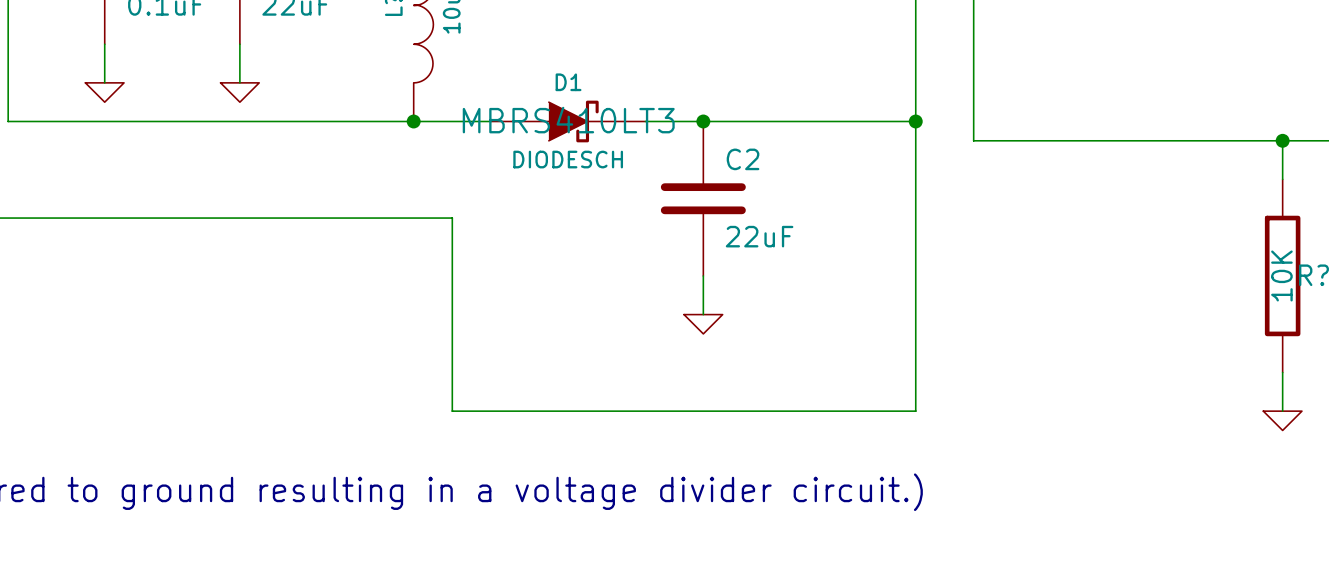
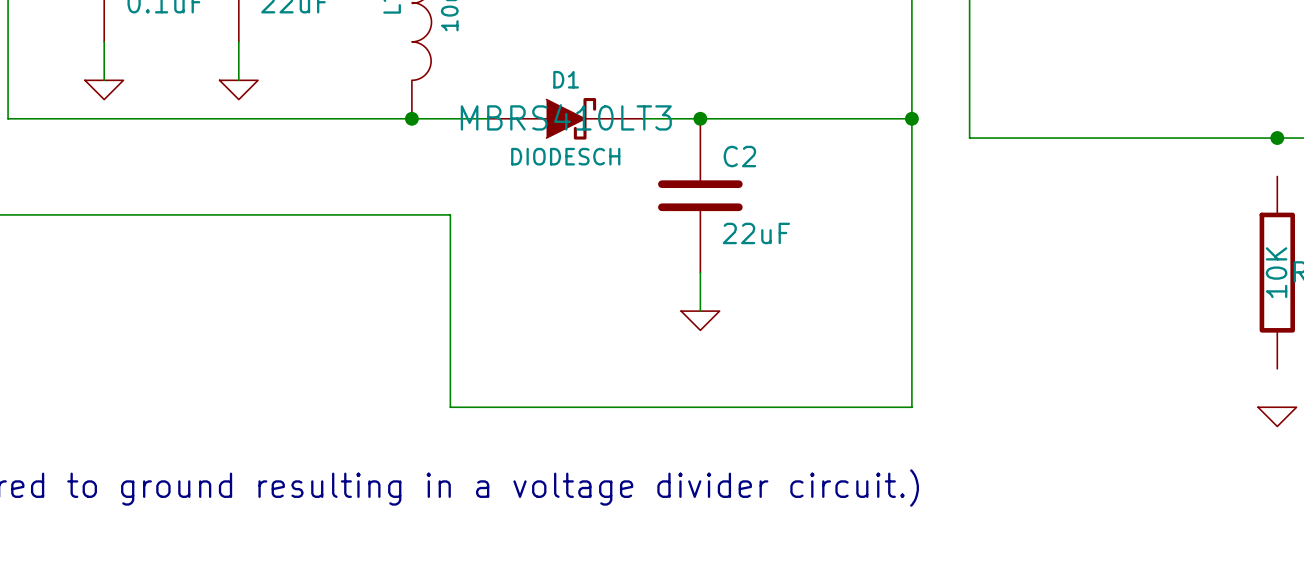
wire: (1282, 140) (1282, 179) -> none
wire: (1282, 372) (1282, 411) -> none

